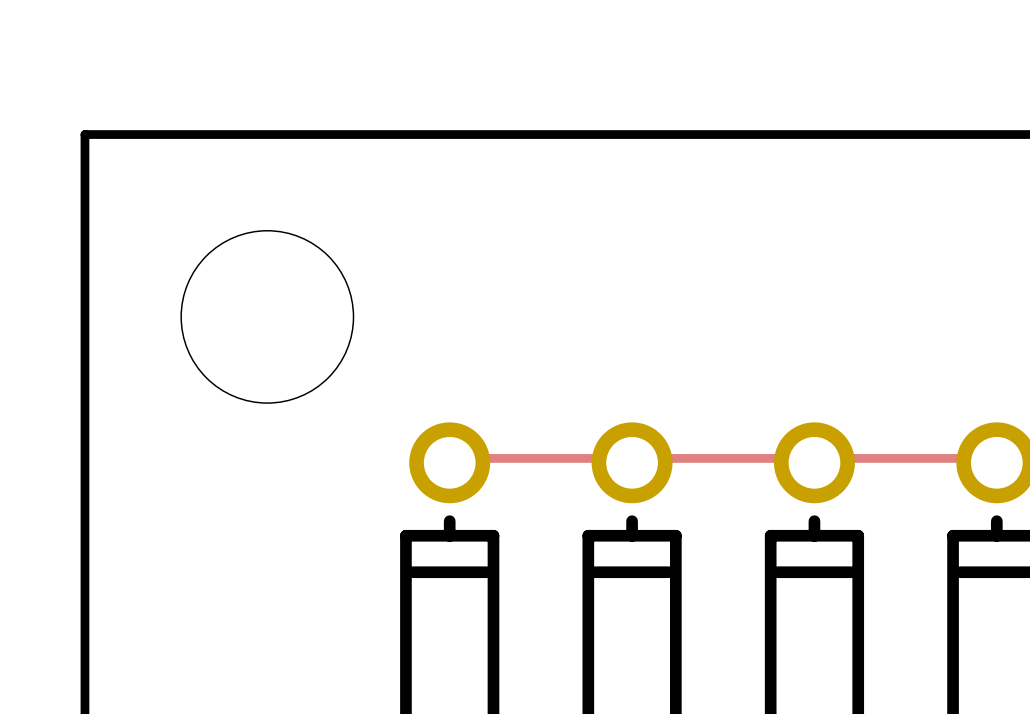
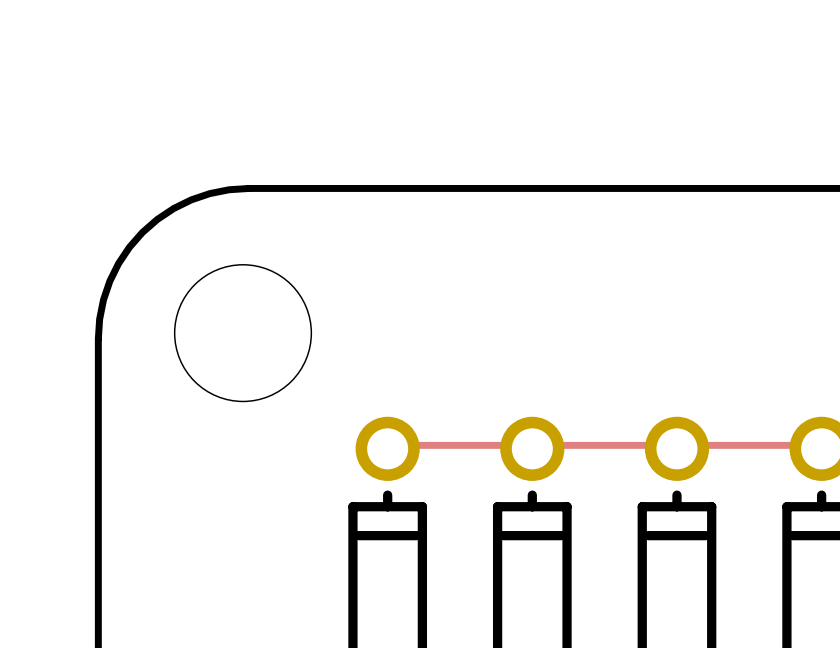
board edge: (274, 134) (84, 134) (84, 324) -> (248, 188) (229, 189) (191, 199) (157, 219) (142, 232) (129, 247) (109, 281) (99, 319) (98, 338)

